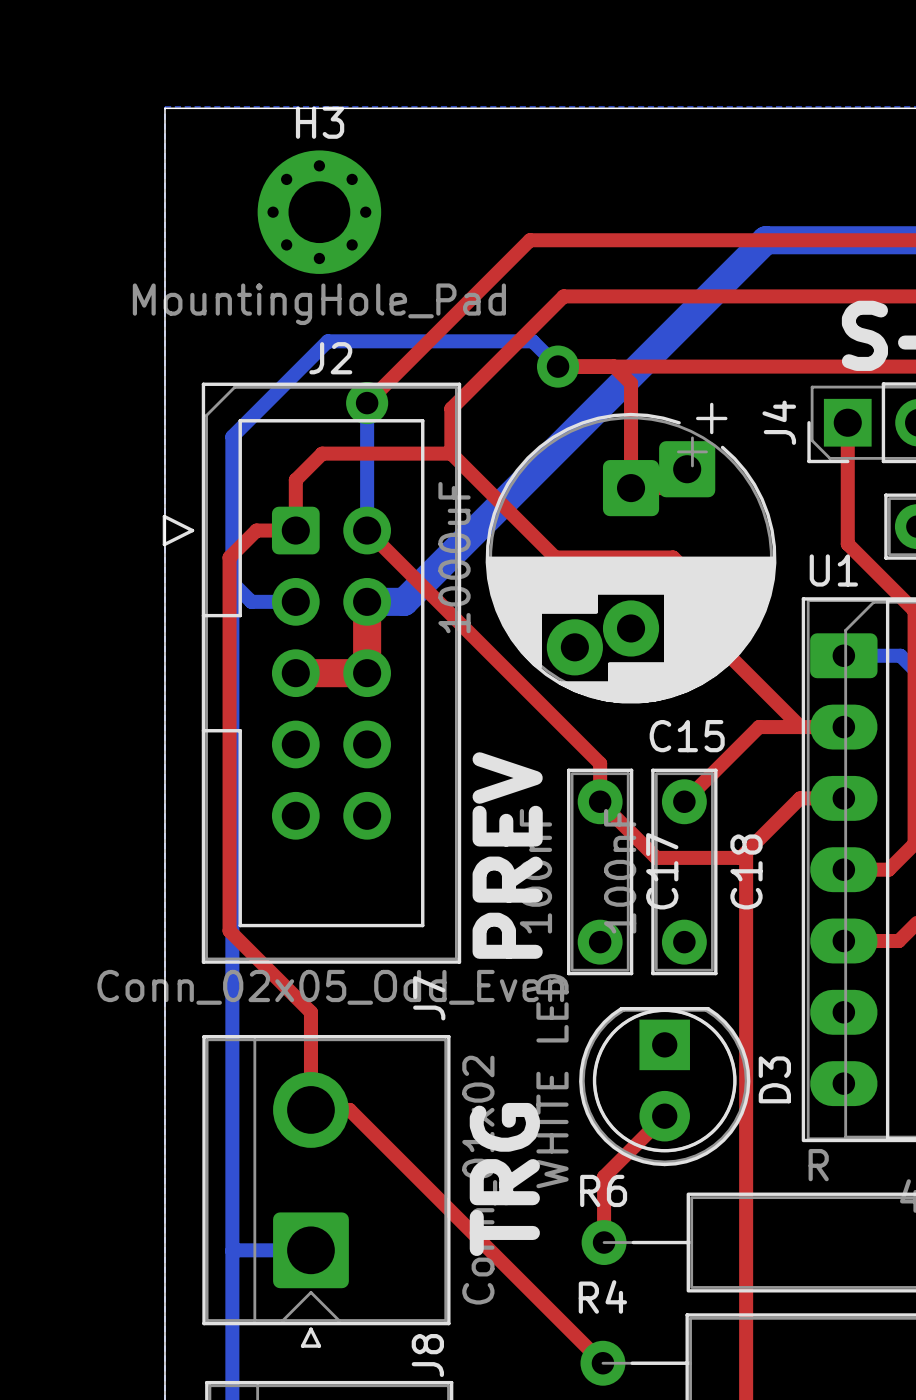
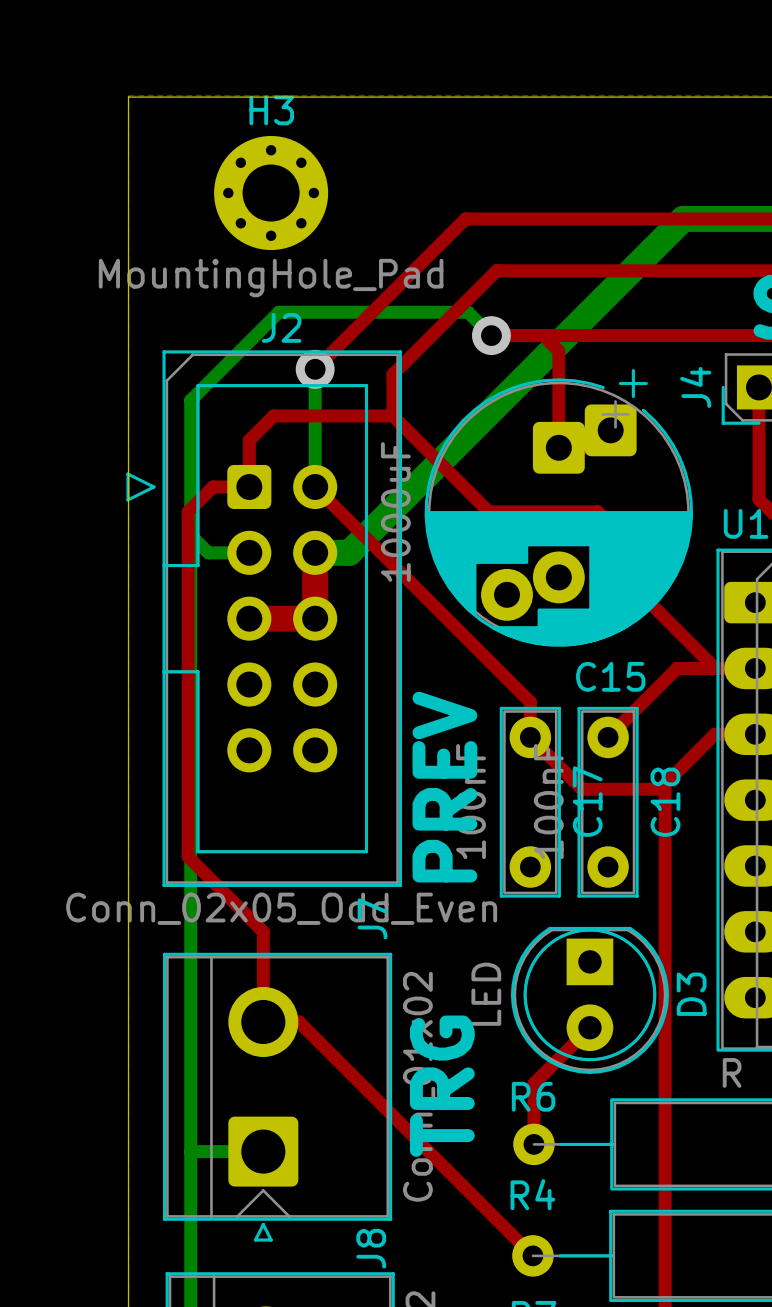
D3 value: WHITE LED (552, 1081) -> LED (486, 994)

